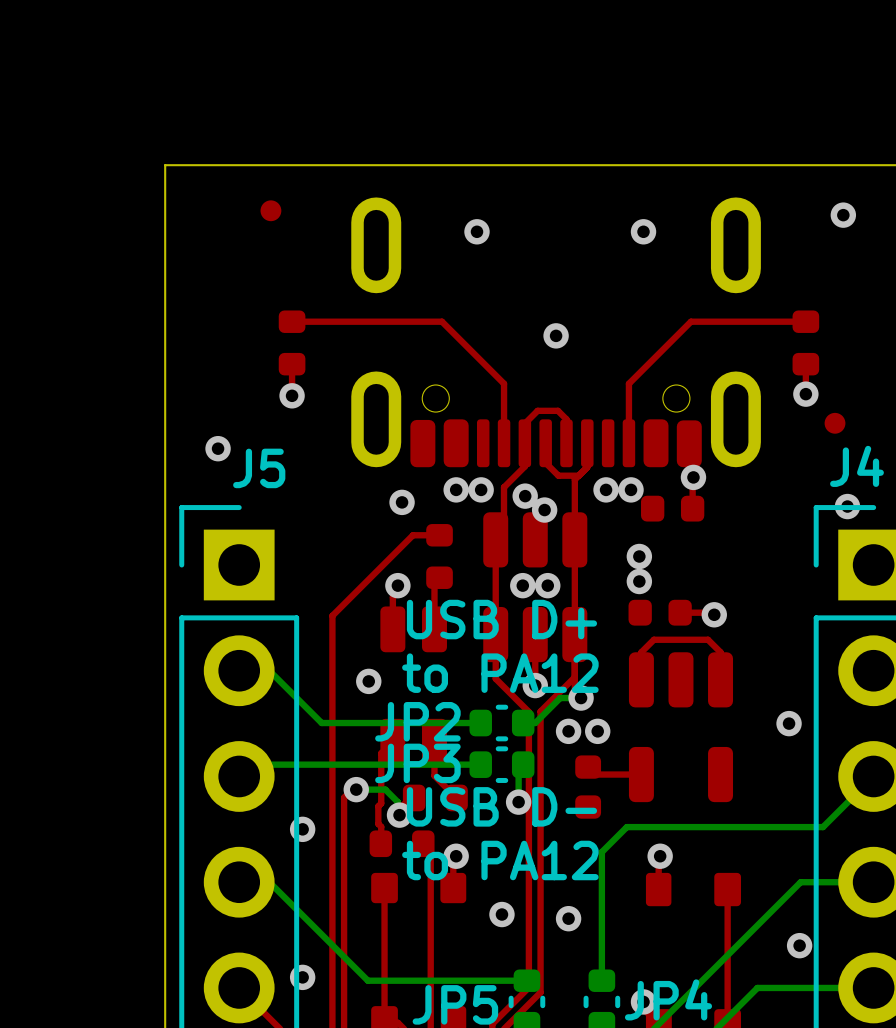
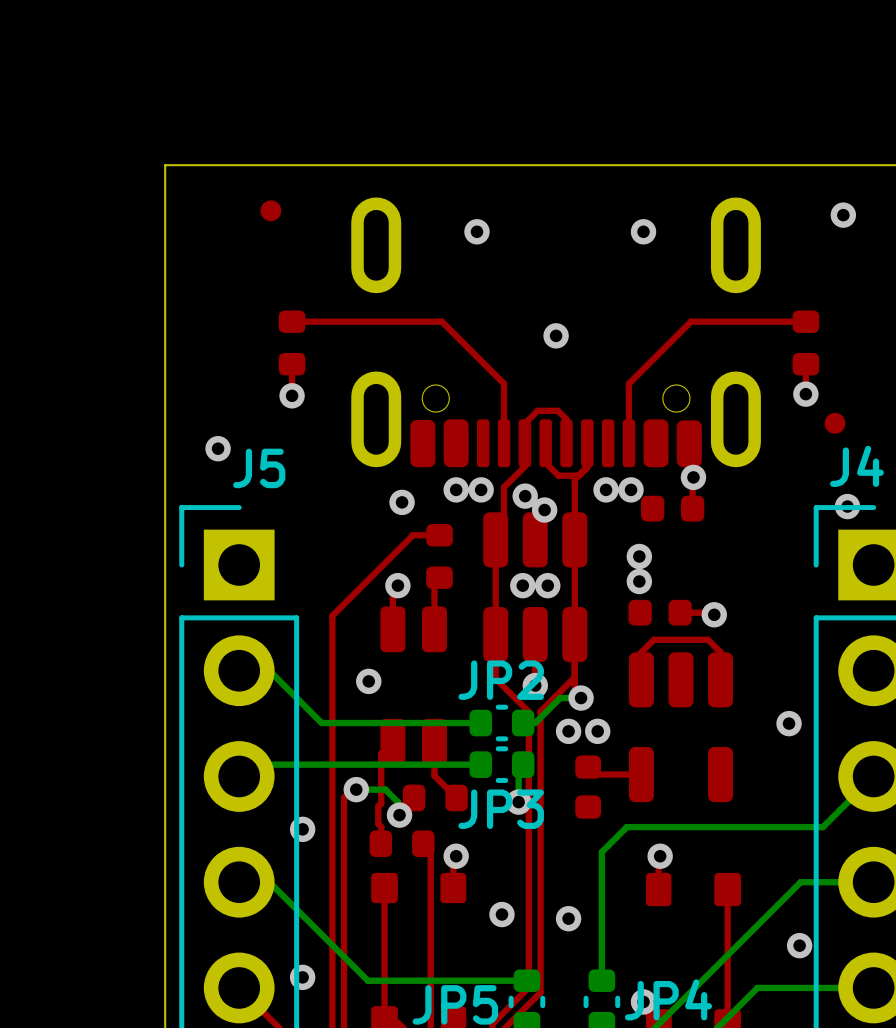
text: USB D+ (501, 619) -> none
text: to PA12 (500, 673) -> none
JP2 name position: JP2 (417, 721) -> JP2 (501, 680)
JP3 name position: JP3 (417, 763) -> JP3 (501, 809)
text: USB D- (501, 806) -> none
text: to PA12 (500, 860) -> none

